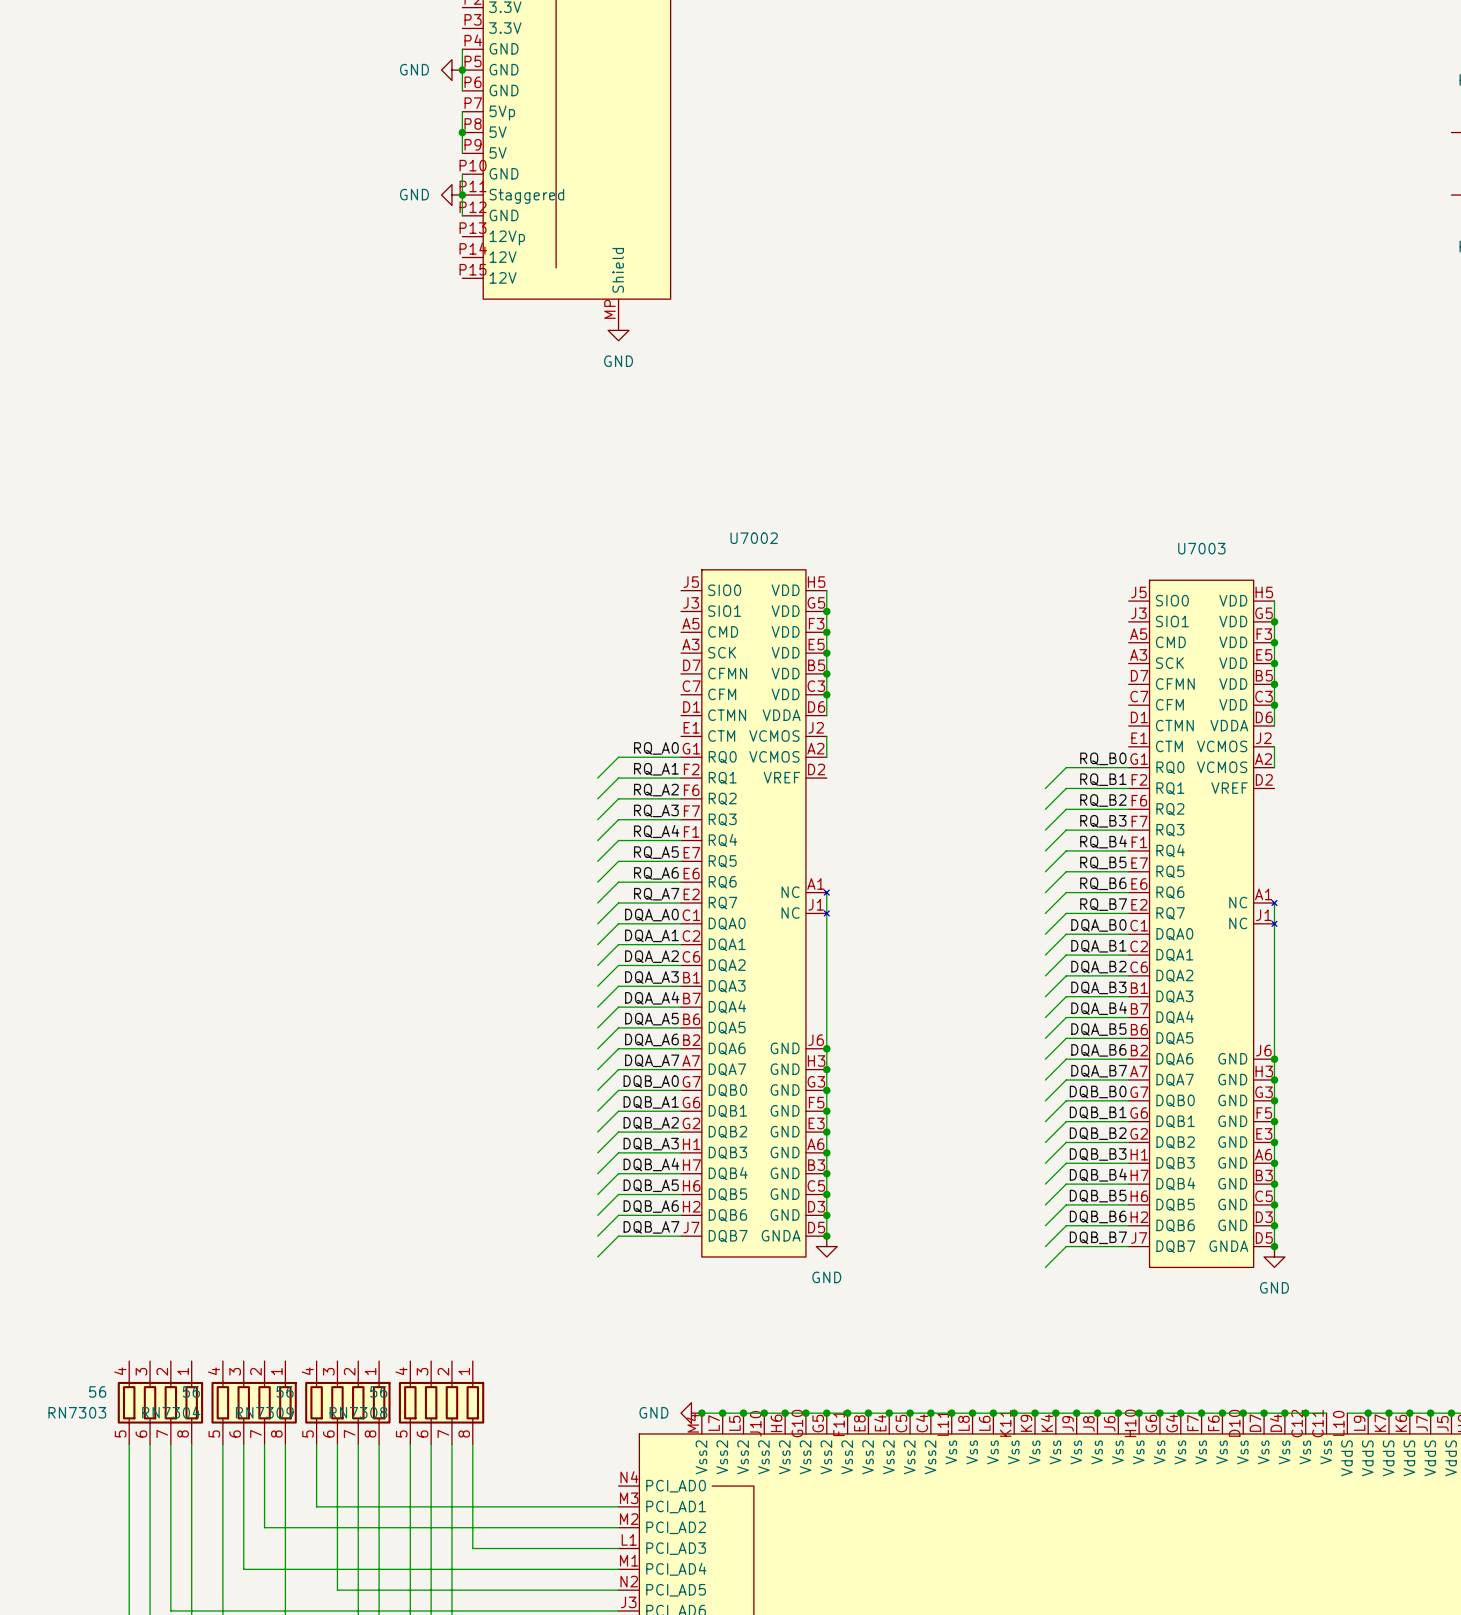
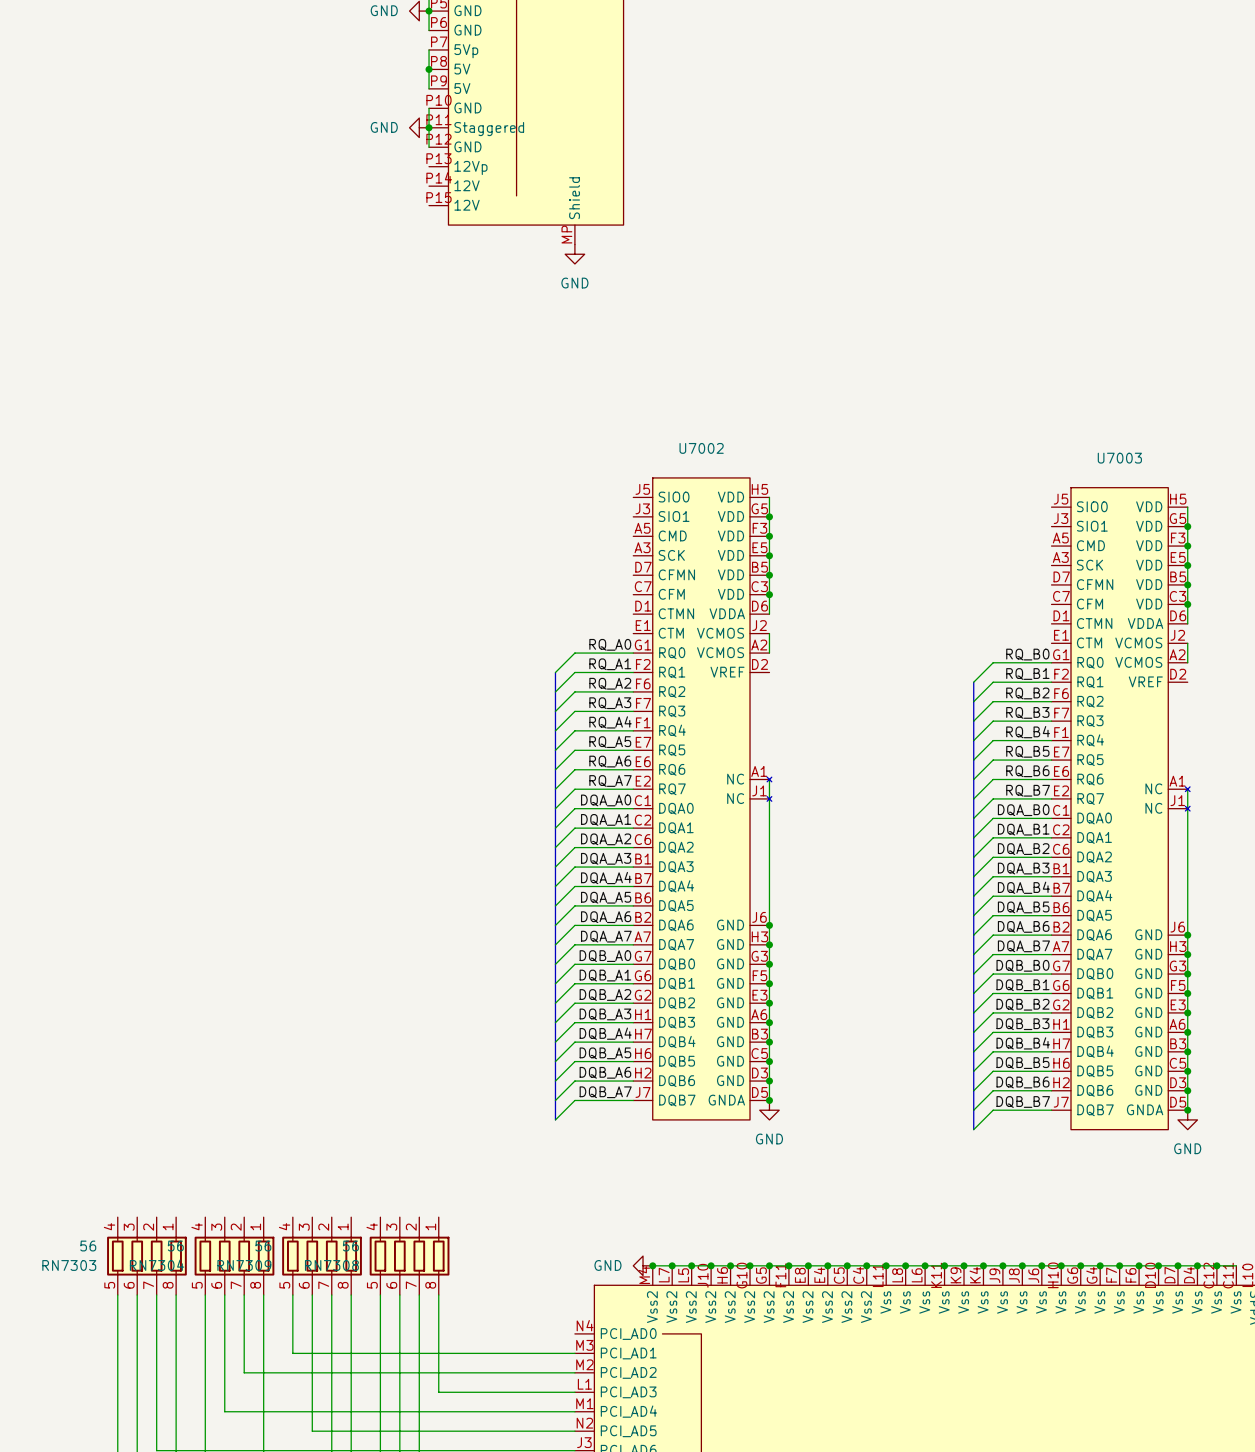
bus: none -> (555, 672) (555, 1119)
bus: none -> (973, 682) (973, 1129)

